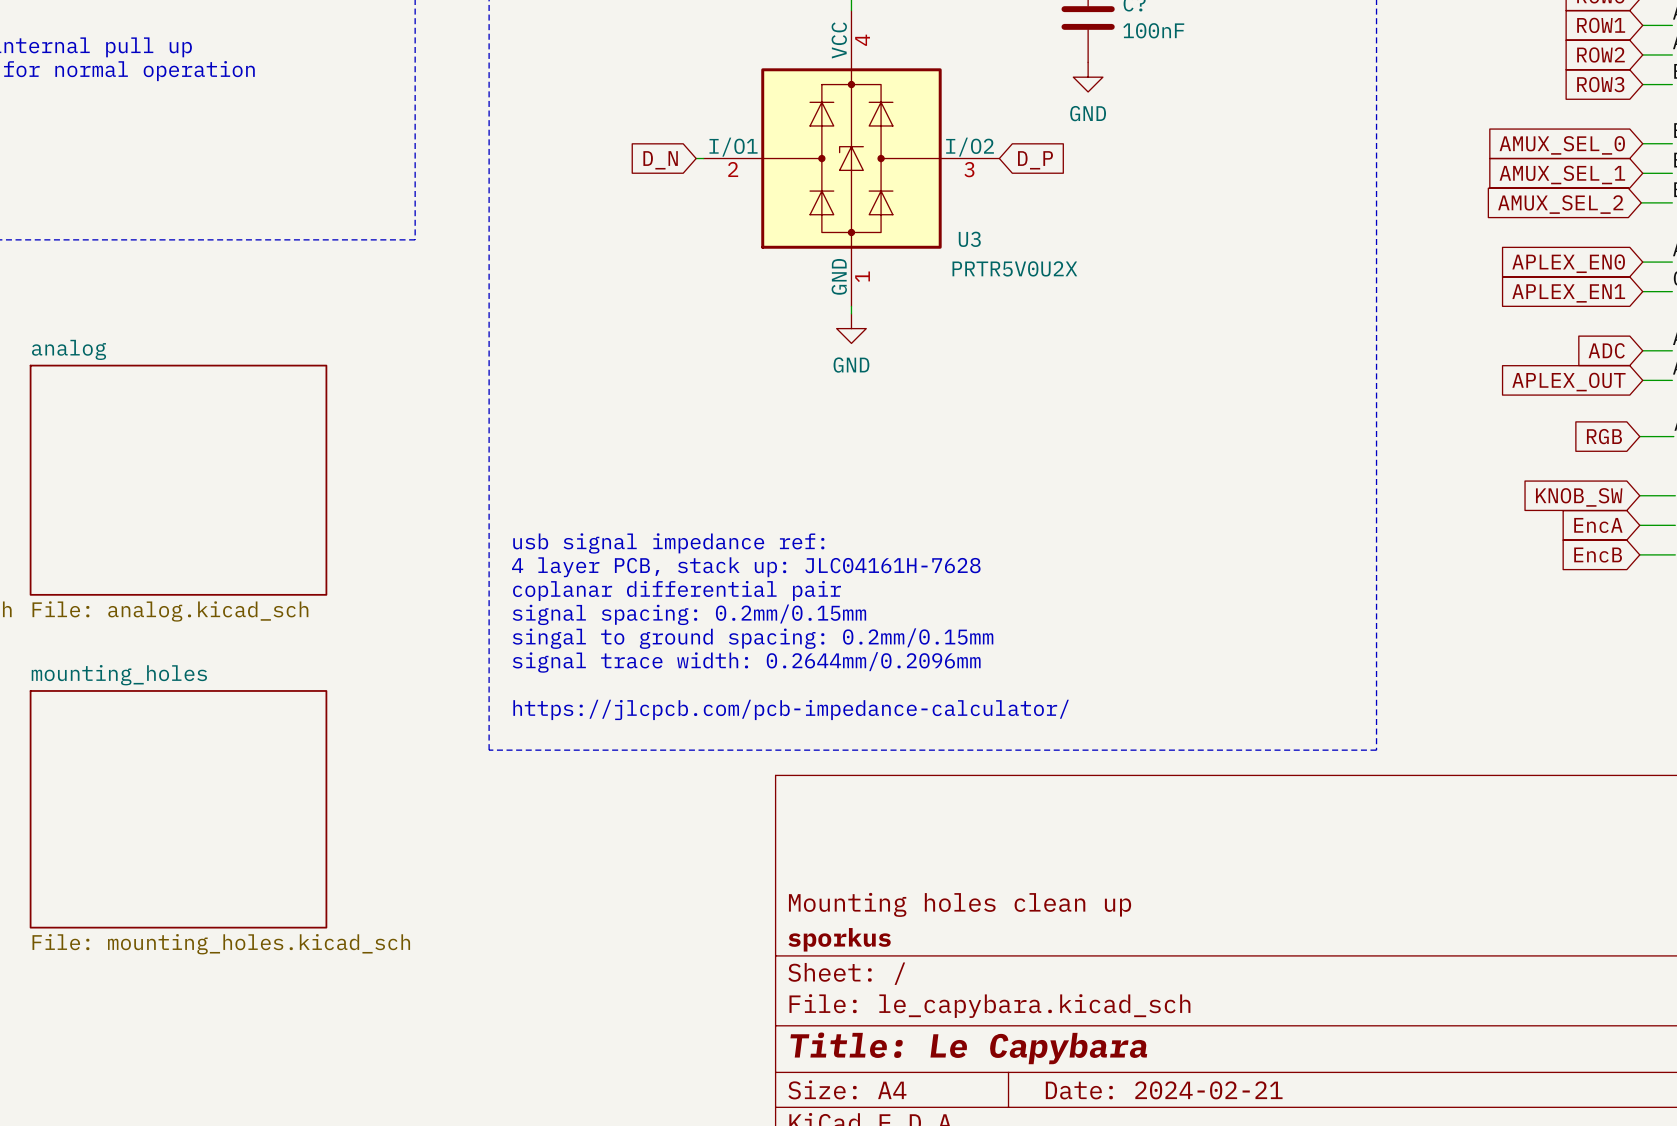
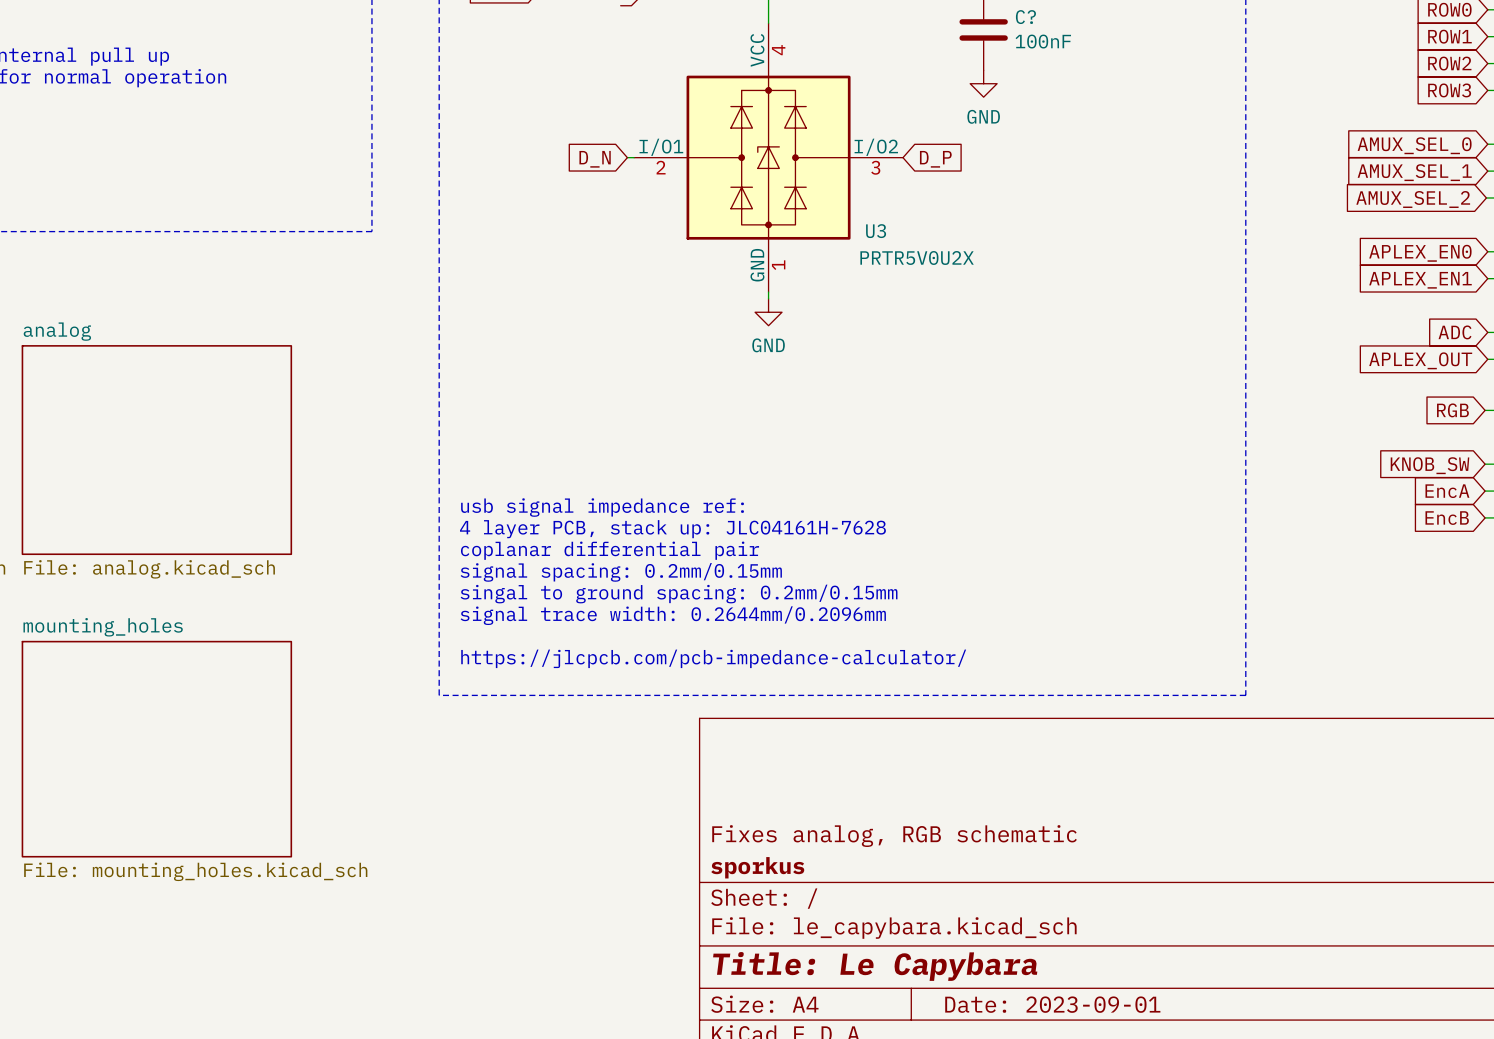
title block: Mounting holes clean up (960, 904) -> Fixes analog, RGB schematic (894, 836)
title block: Date: 2024-02-21 (1164, 1090) -> Date: 2023-09-01 (1052, 1004)

